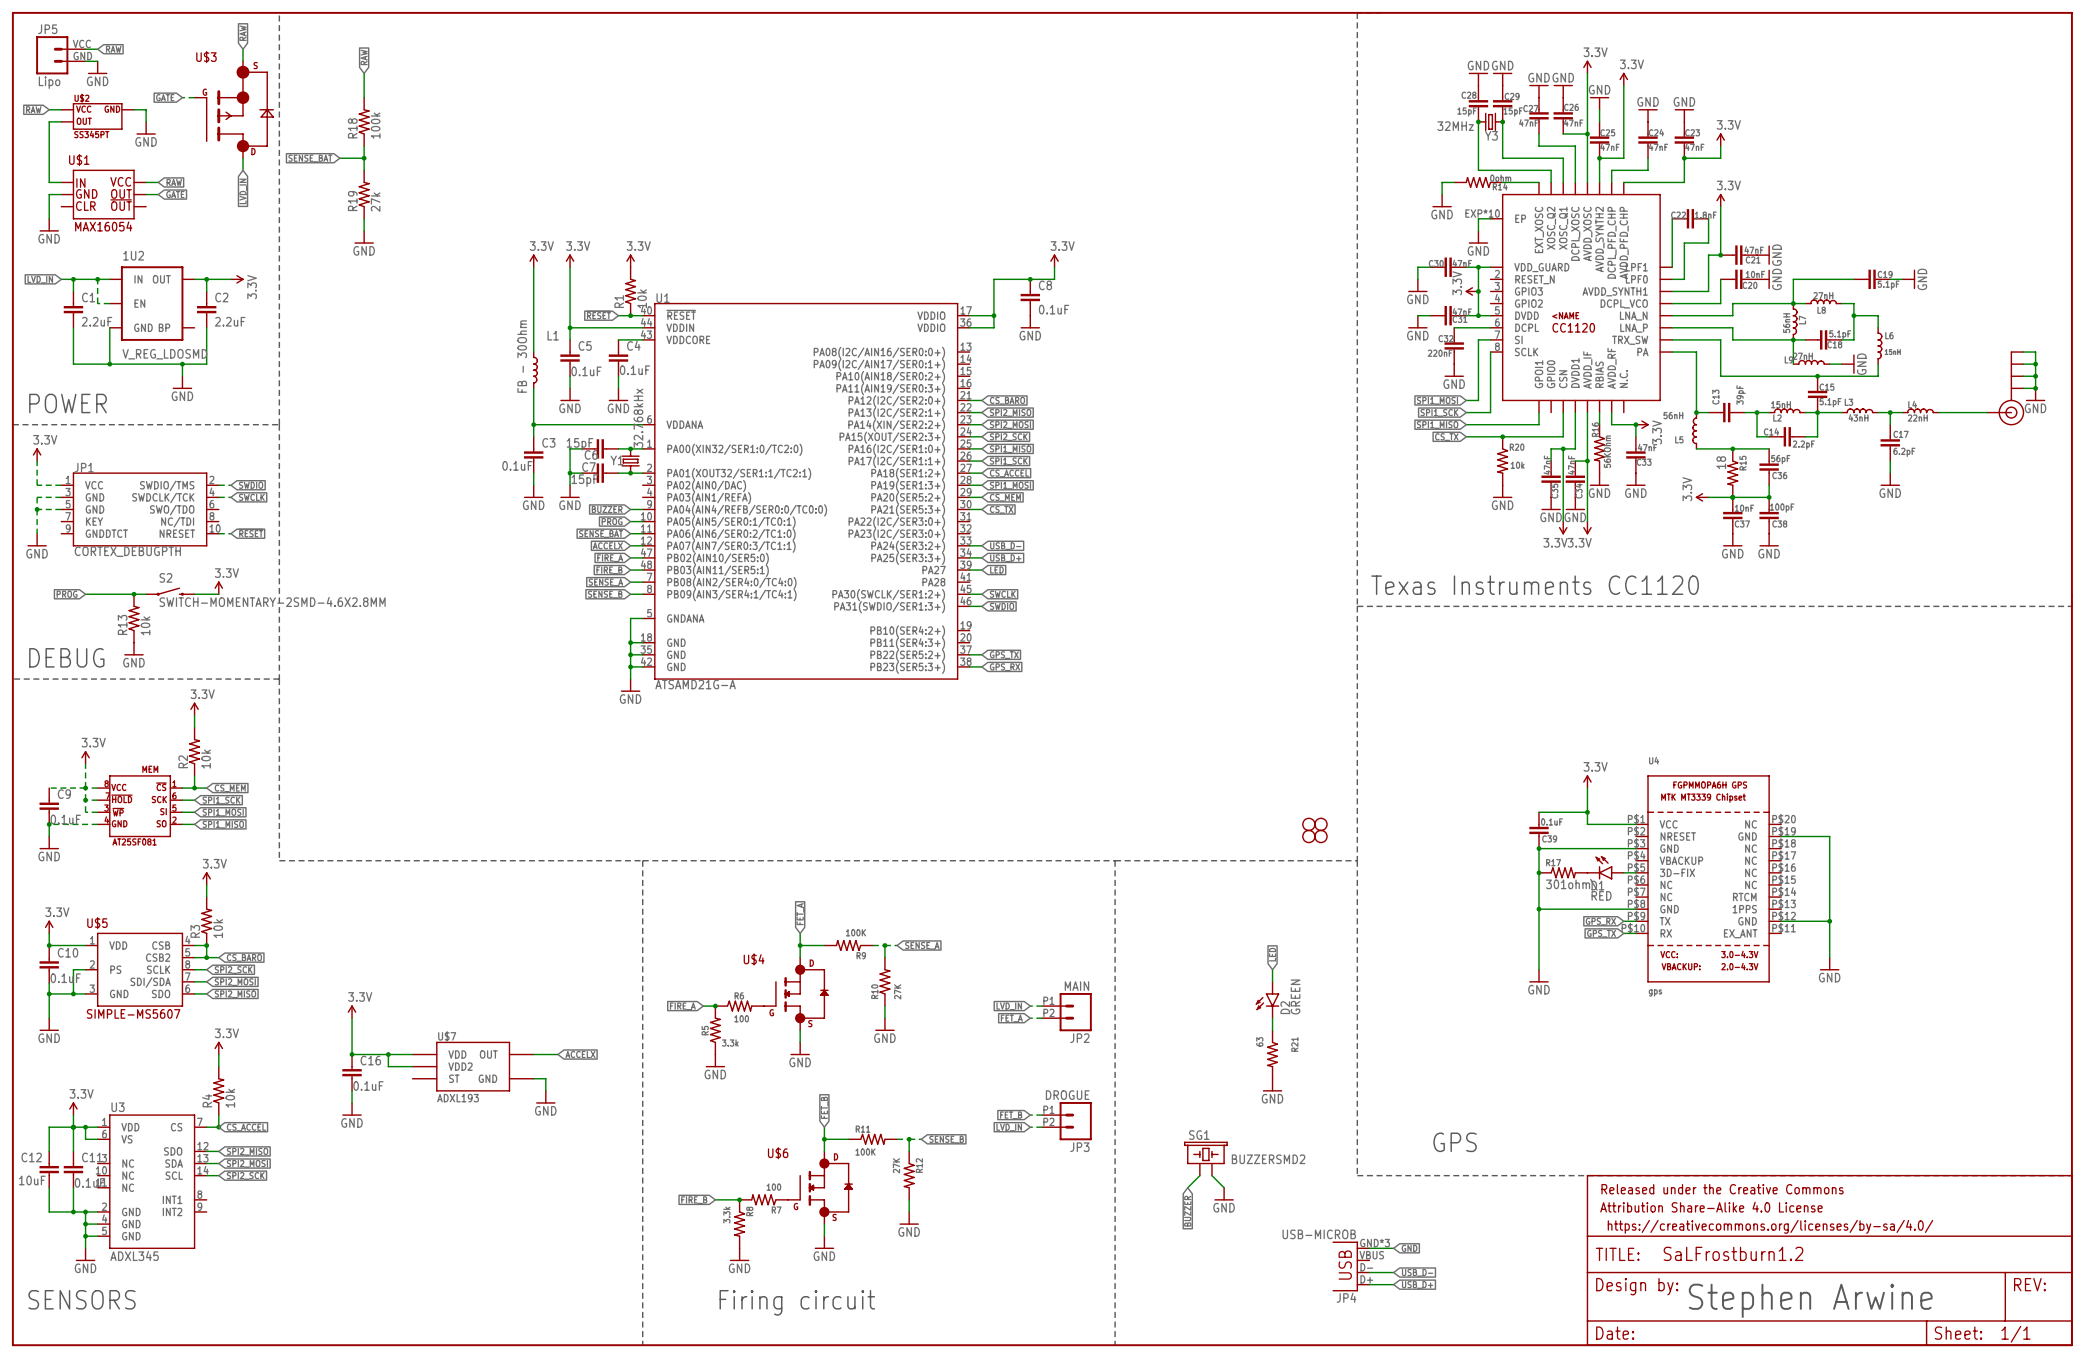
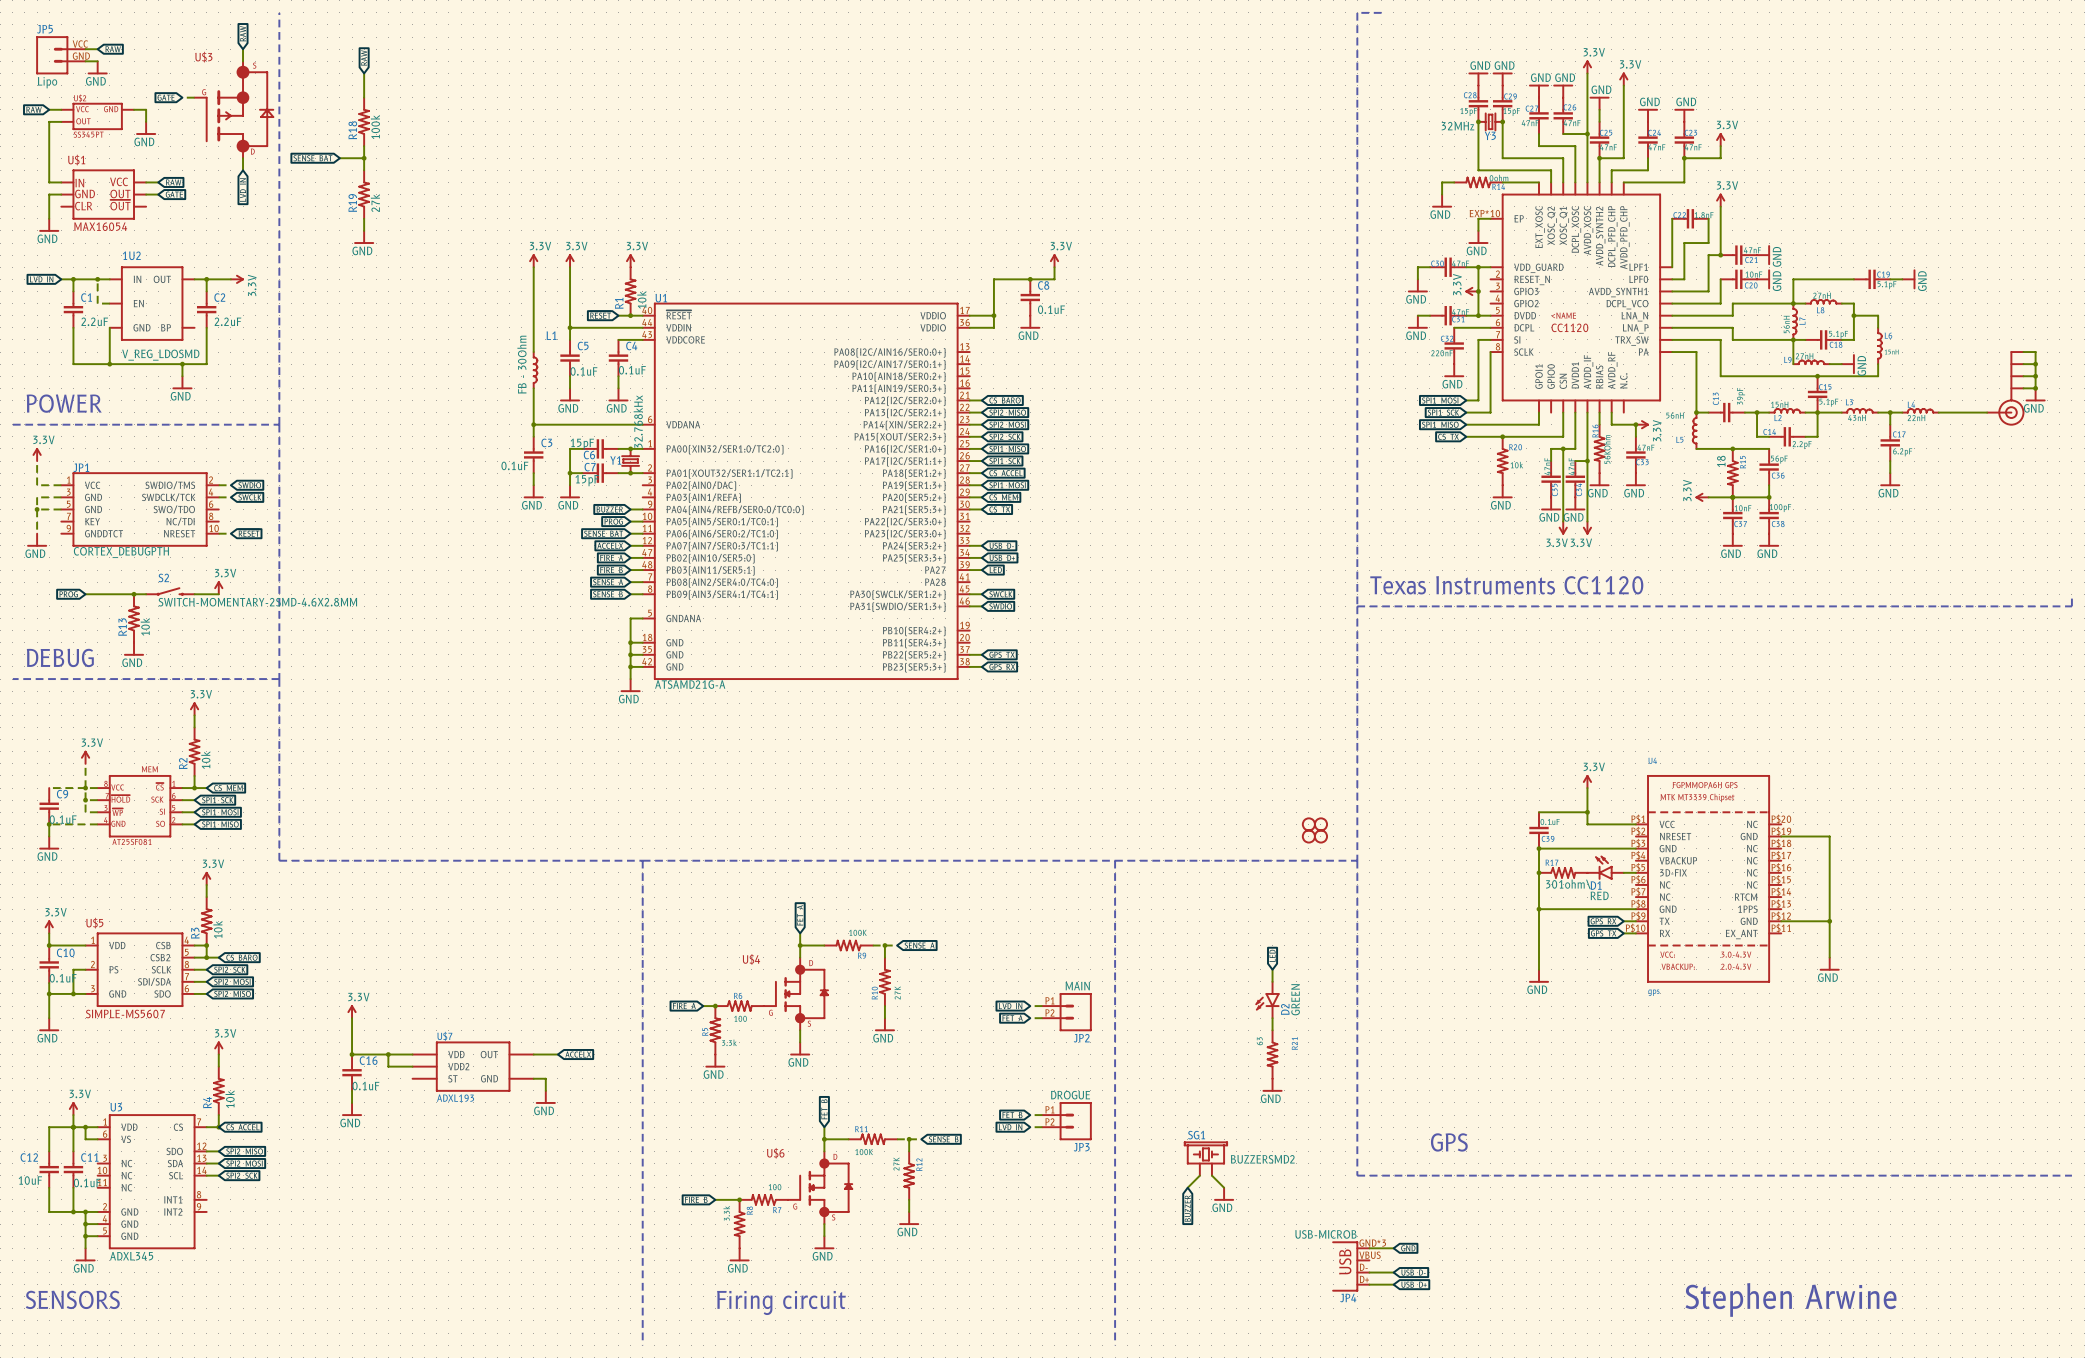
part: (1042, 679) -> none
part: (1829, 1260) -> none

